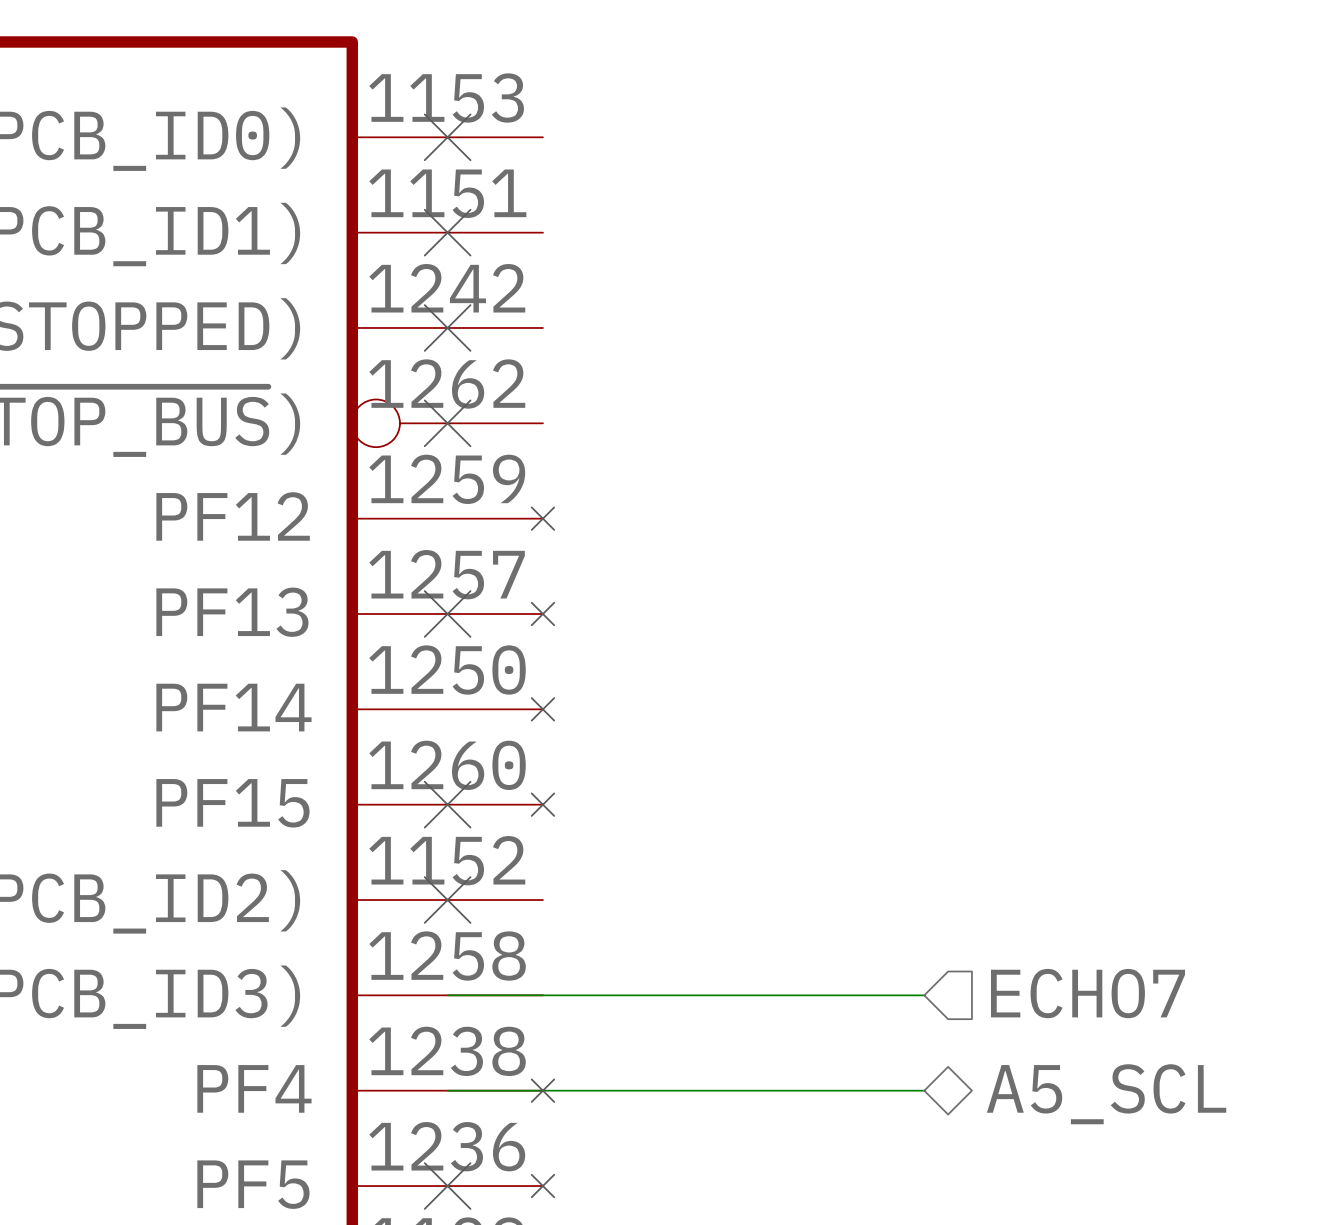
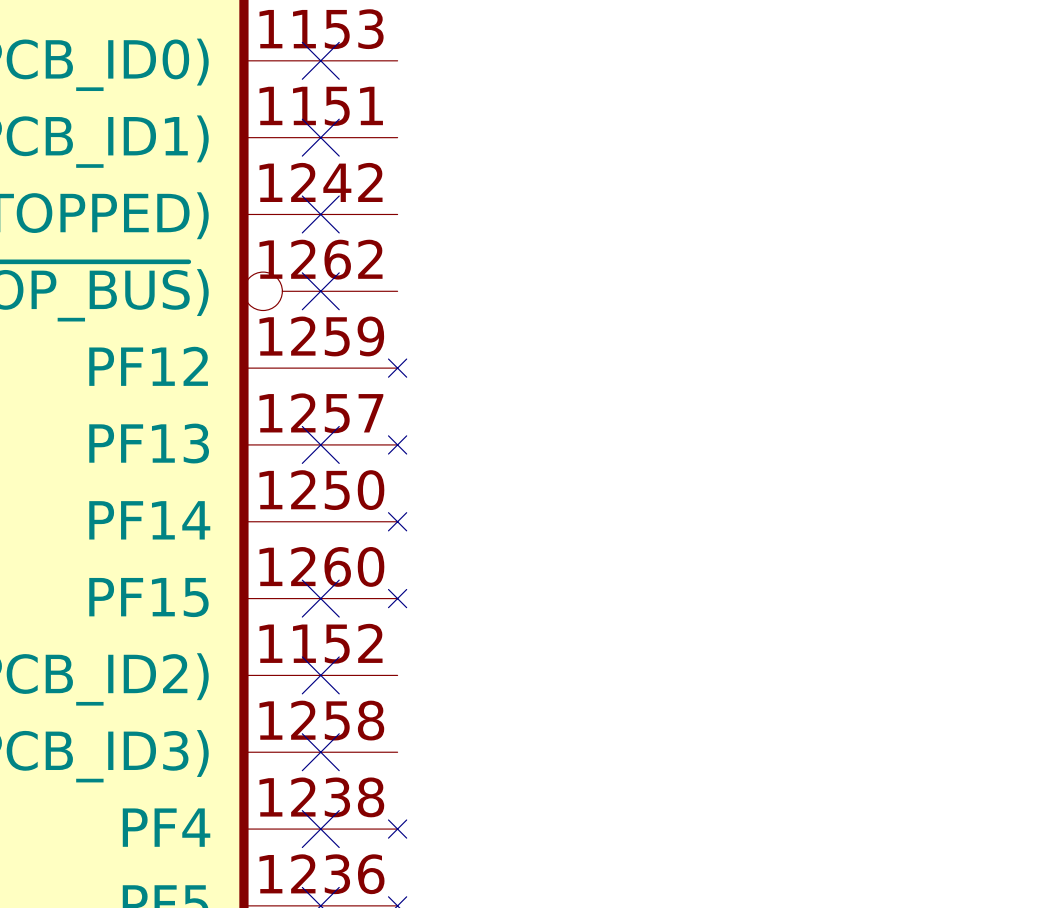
hierarchical label: ECHO7 (1087, 993) -> none
wire: (447, 995) (924, 995) -> none
no-connect mark: none -> (320, 752)
wire: (447, 1090) (924, 1090) -> none
no-connect mark: none -> (320, 829)
hierarchical label: A5_SCL (1106, 1094) -> none

